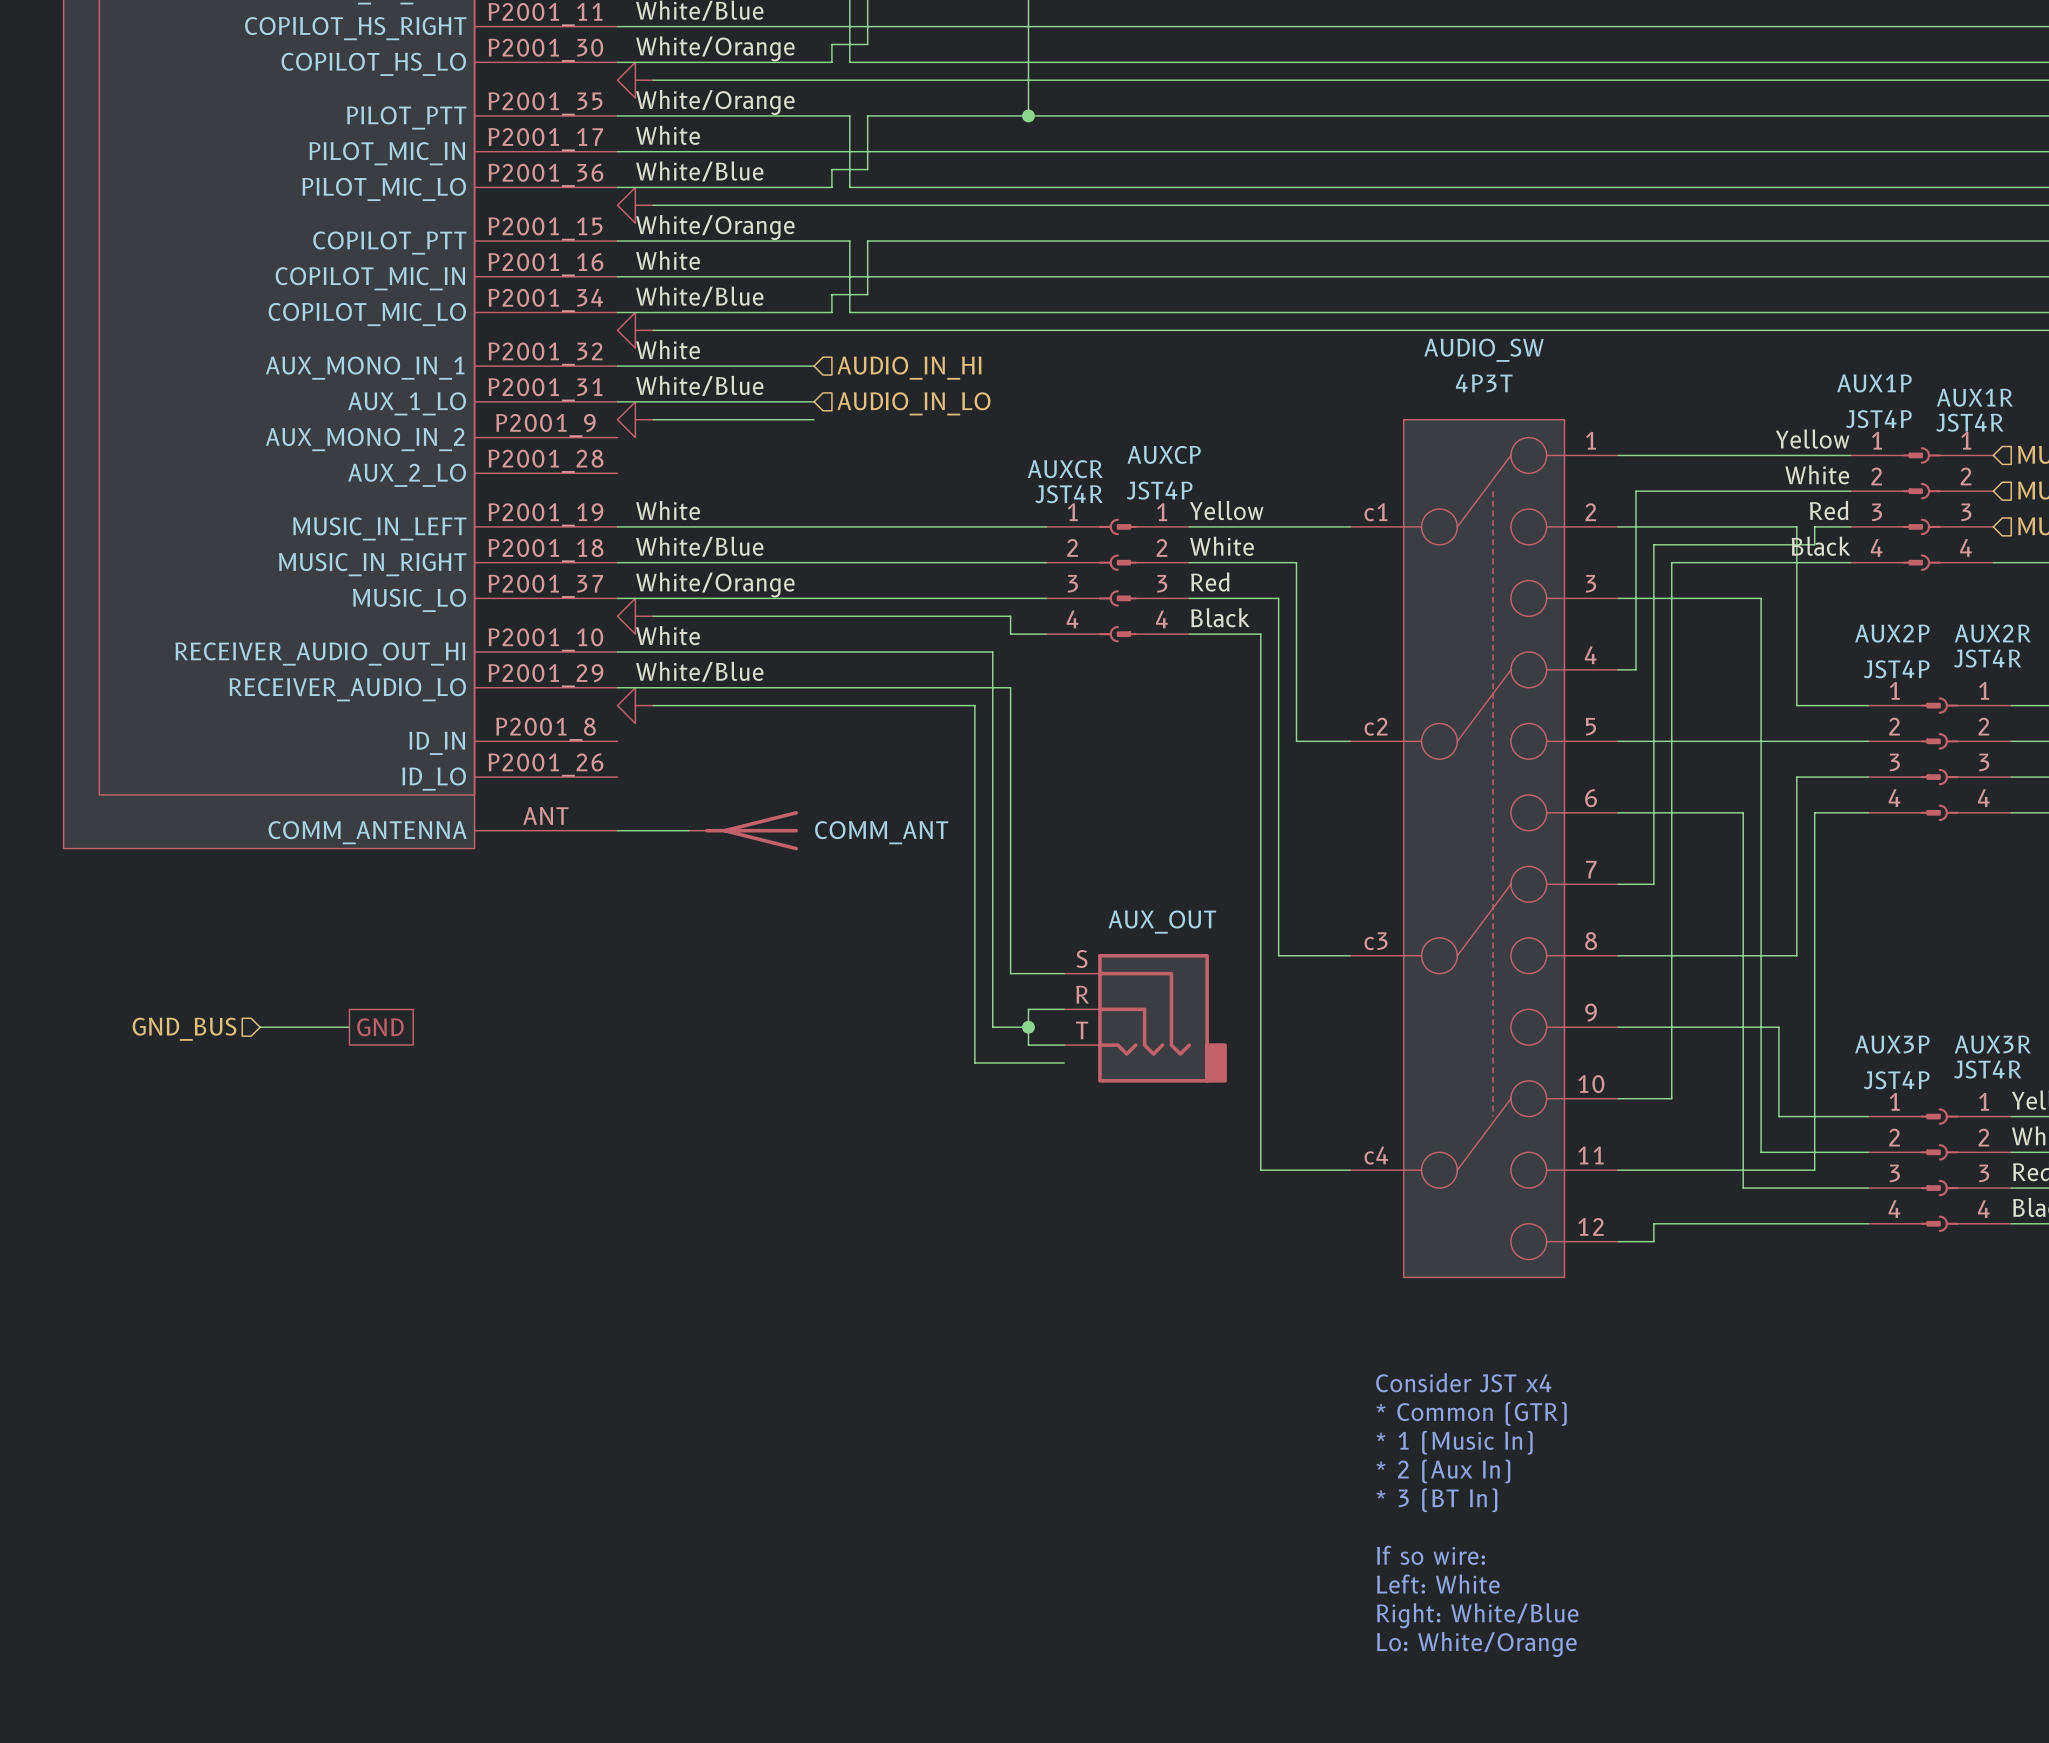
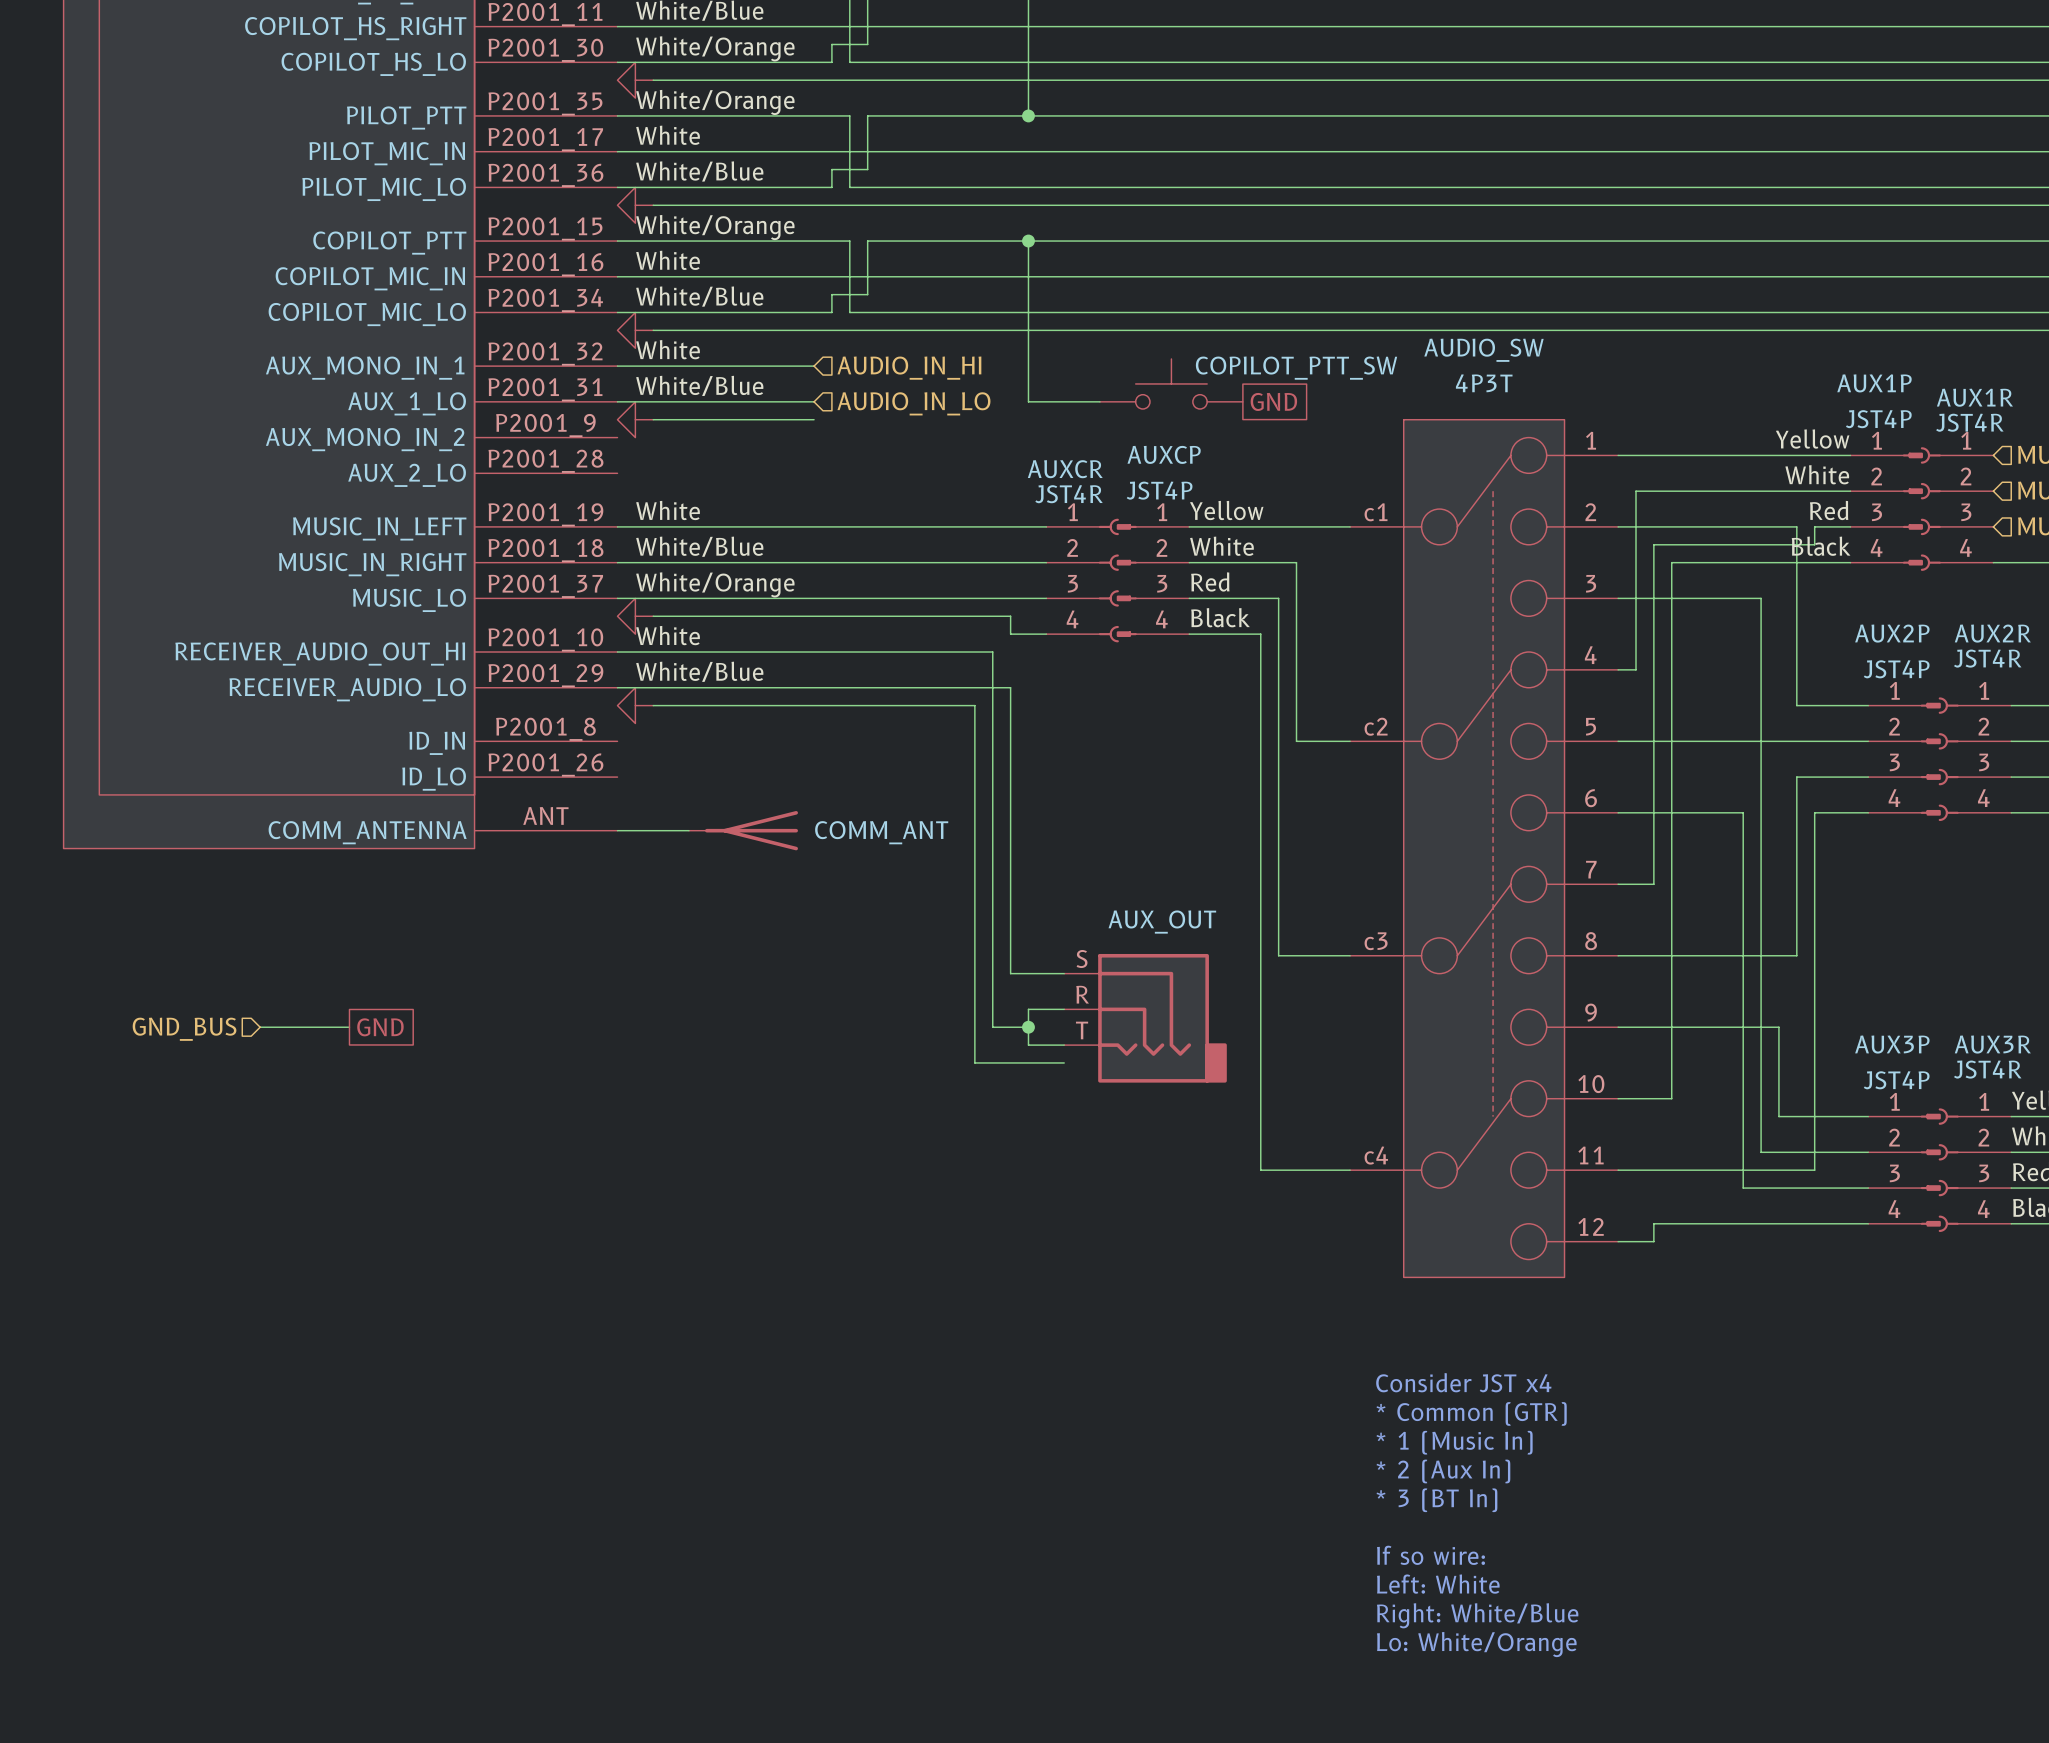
wire: none -> (1028, 241) (1028, 401) (1099, 401)
junction: none -> (1028, 241)
COPILOT_PTT_SW: none -> (1171, 383)
global label: none -> GND (1273, 401)

